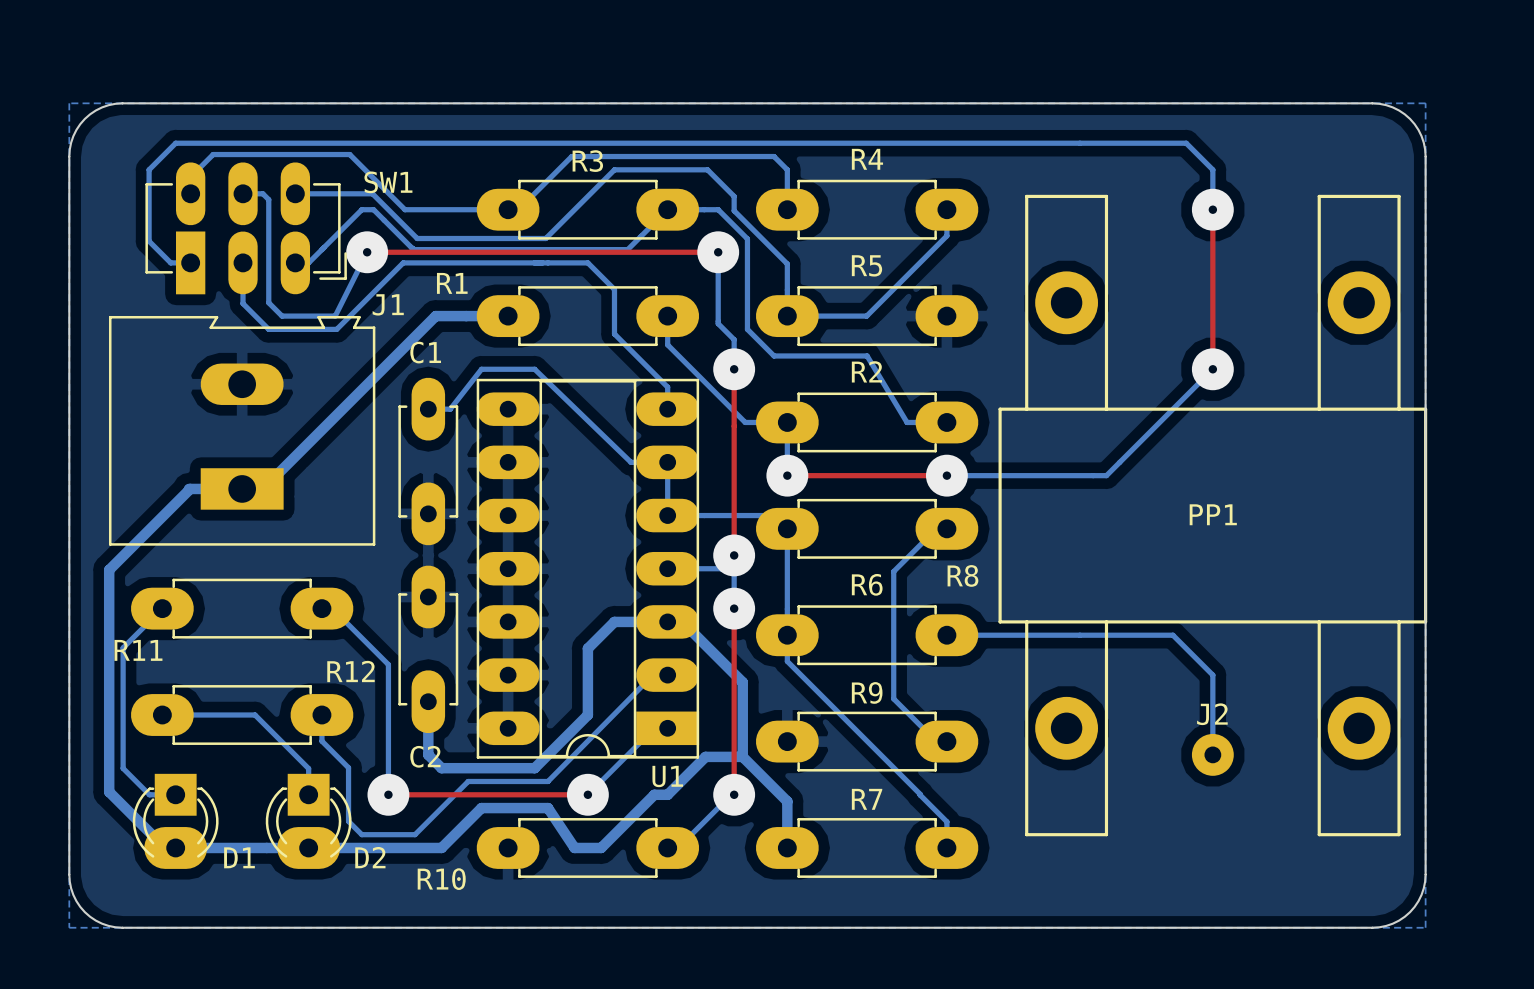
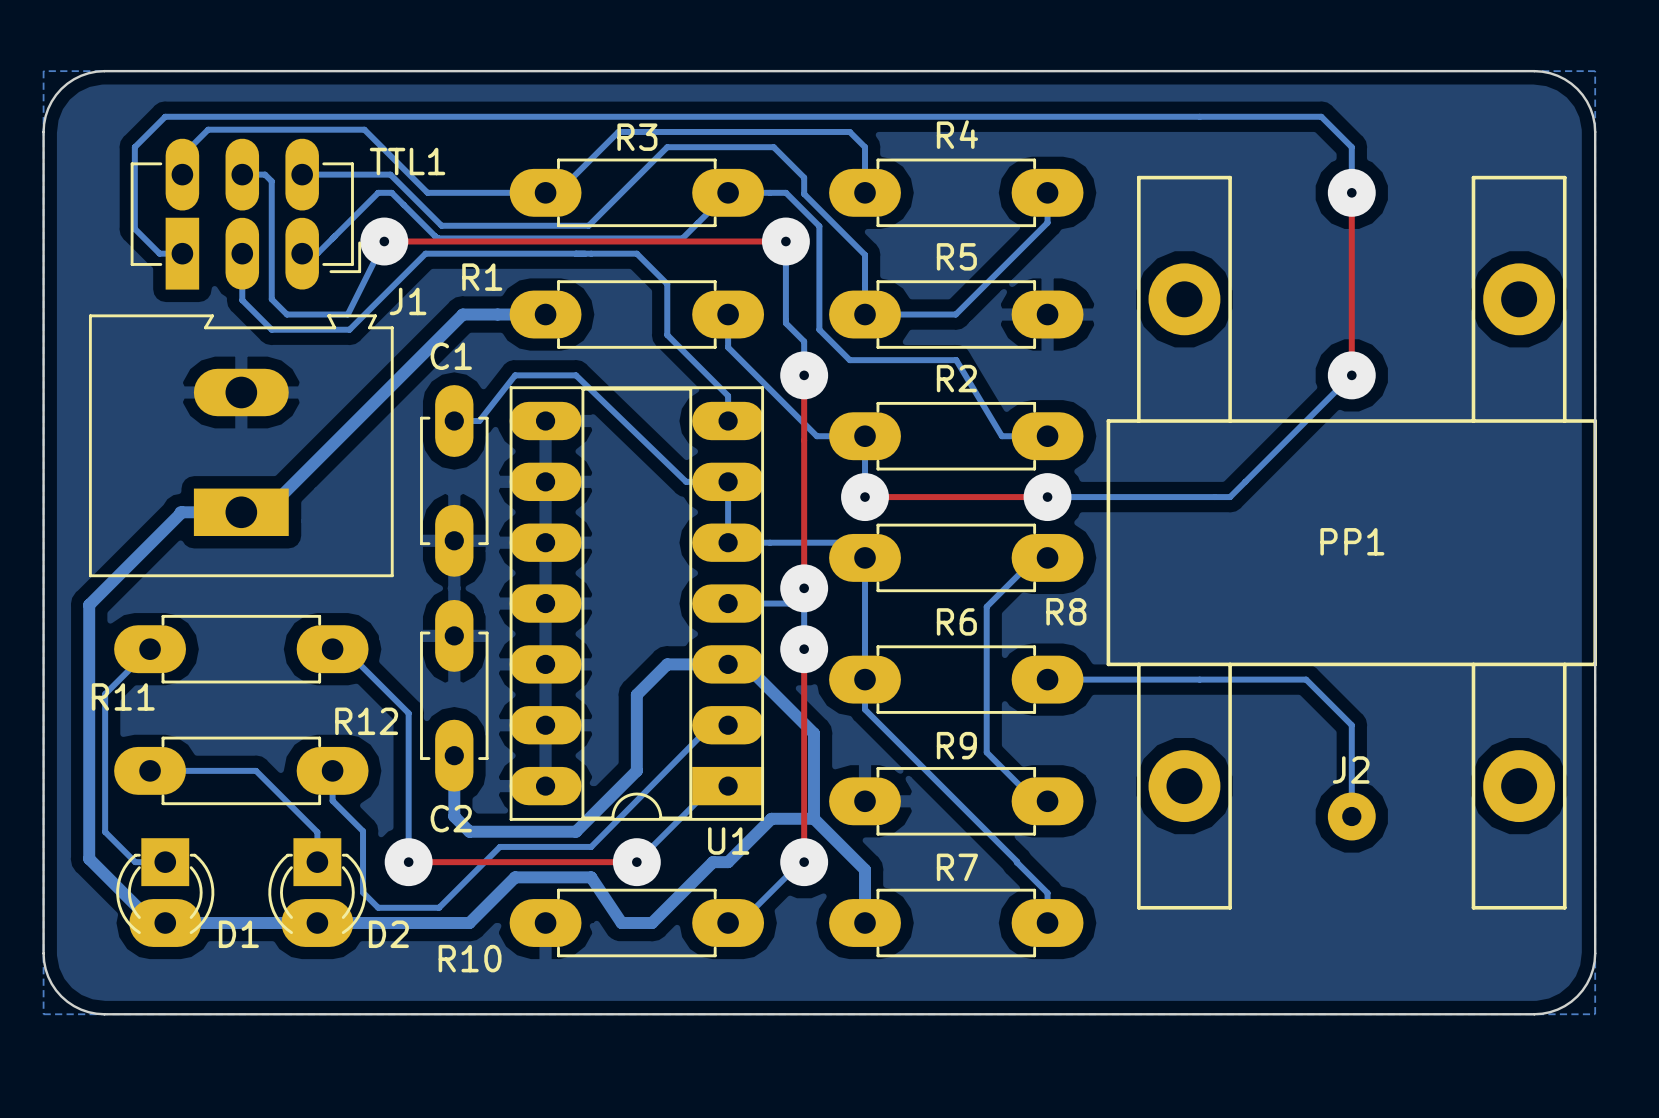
SW1 name: SW1 (388, 182) -> TTL1 (407, 161)

